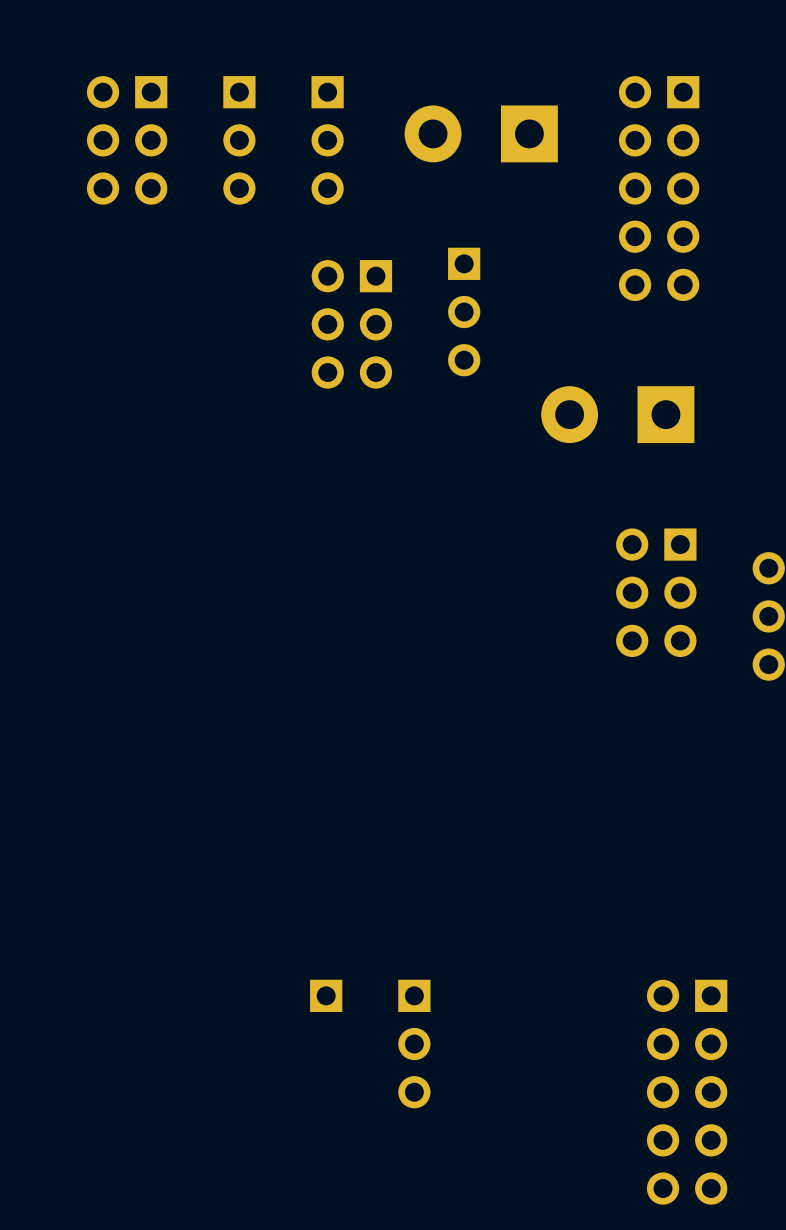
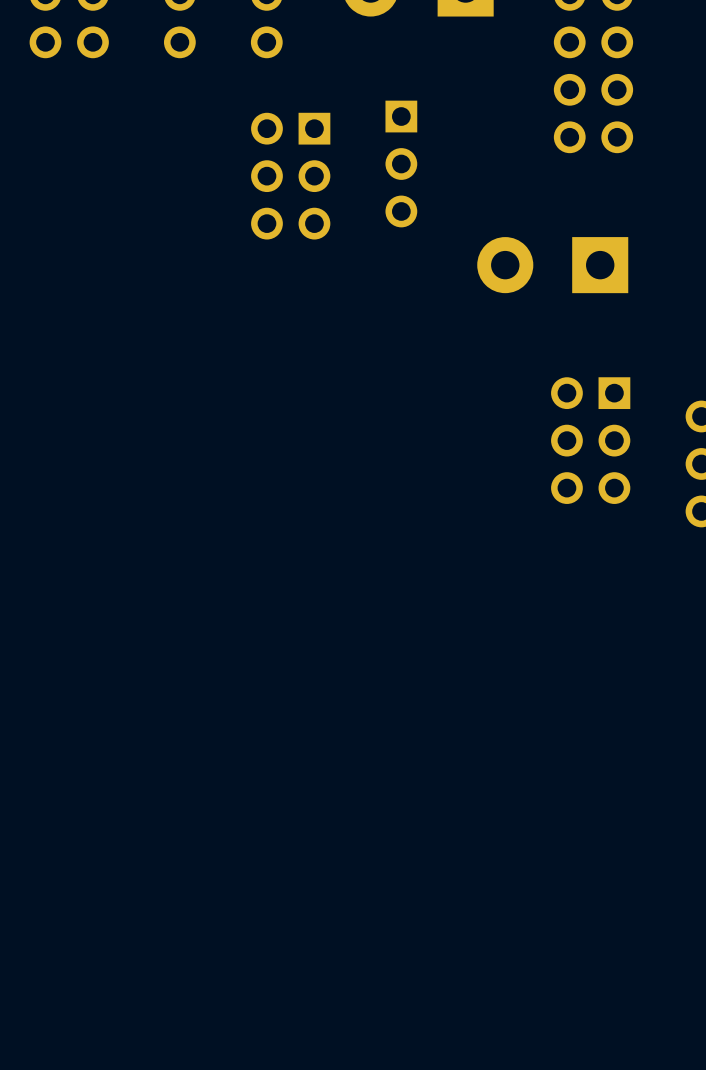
part: (326, 995) -> none
part: (414, 1044) -> none
part: (687, 1092) -> none

